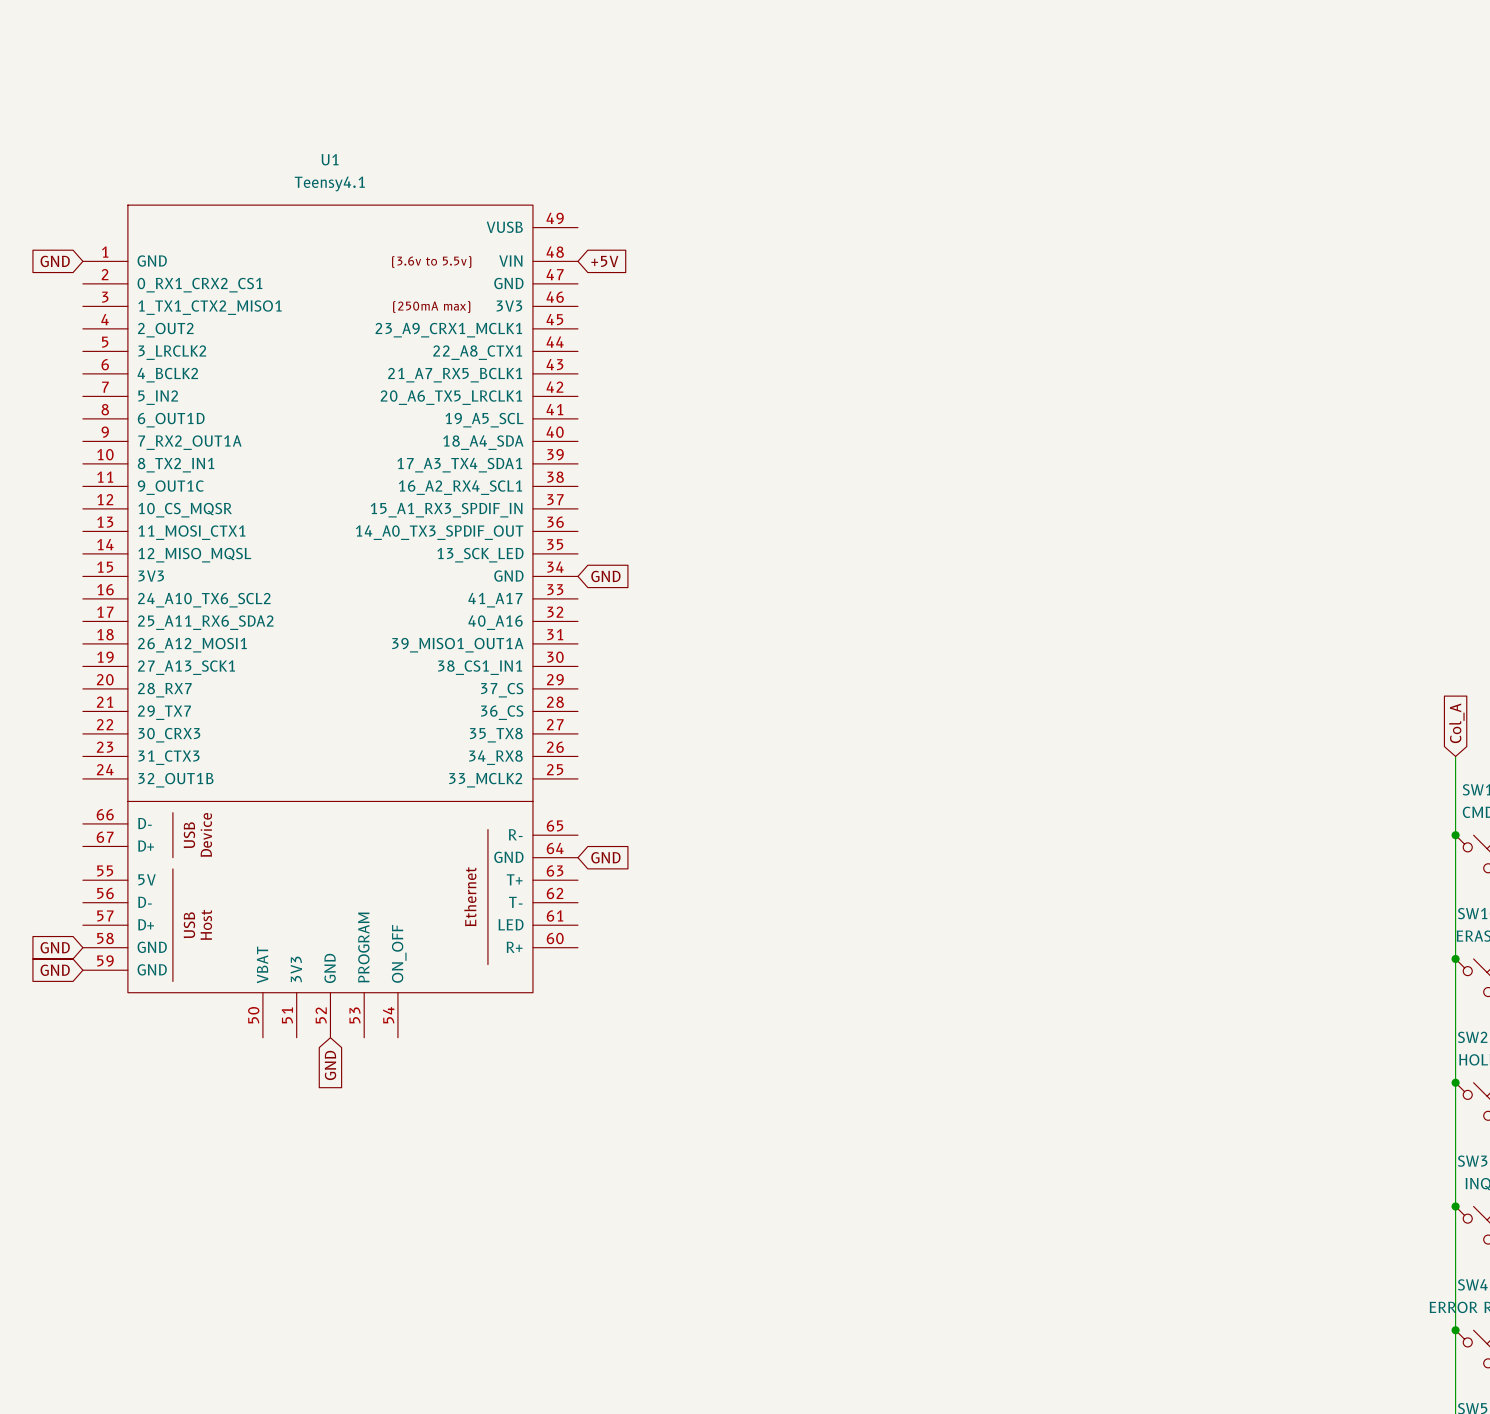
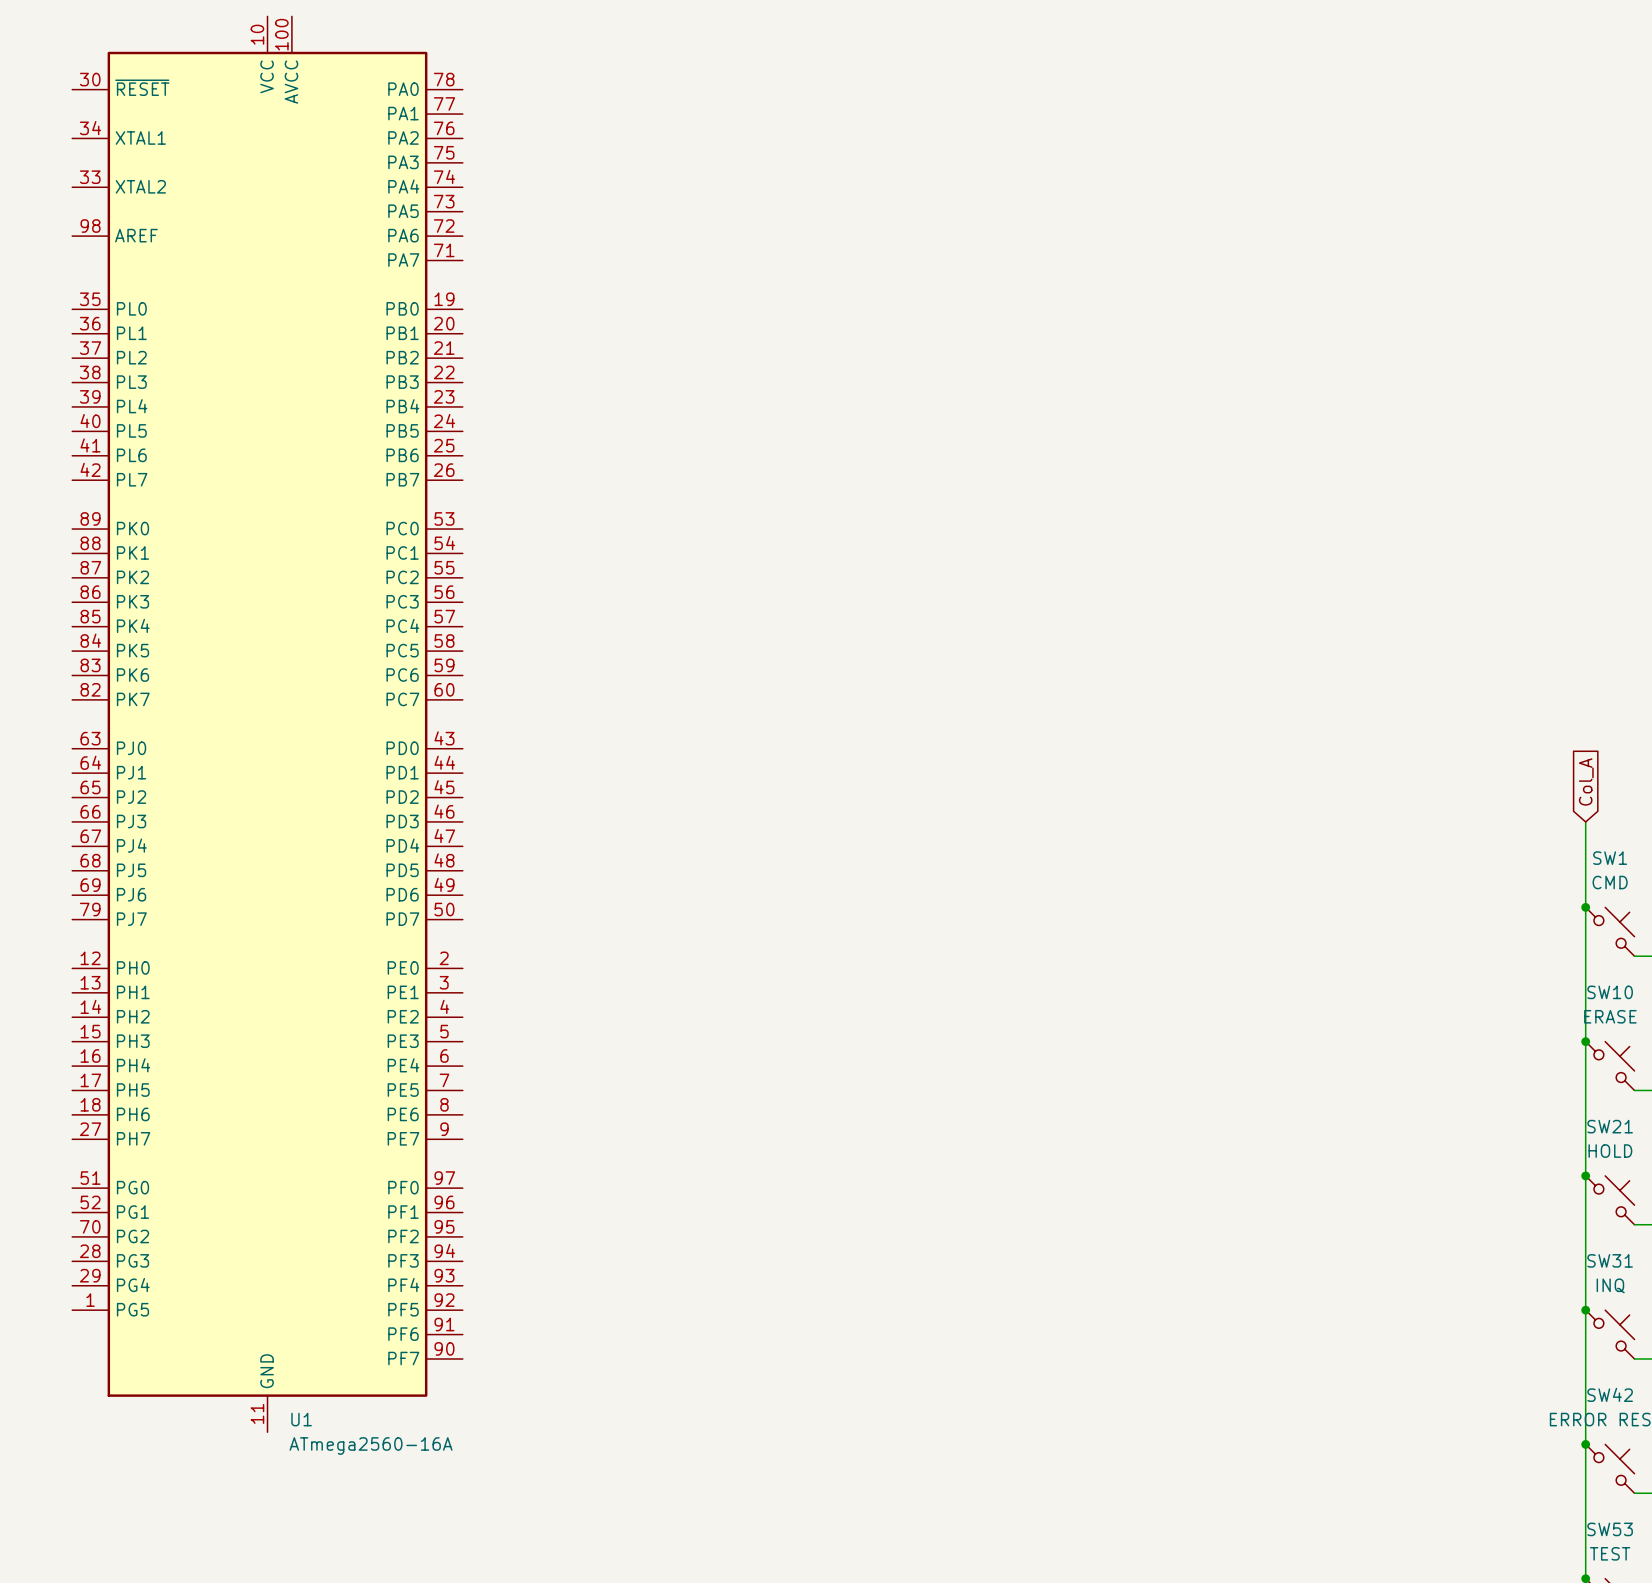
U1 name position: U1 (330, 159) -> U1 (301, 1419)
U1 value: Teensy4.1 (329, 183) -> ATmega2560-16A (371, 1446)
U1 symbol: [82, 205, 578, 1038] -> [72, 16, 463, 1433]
global label: GND (55, 261) -> none
global label: +5V (604, 261) -> none
global label: GND (605, 576) -> none
global label: GND (605, 857) -> none
global label: GND (55, 947) -> none
global label: GND (55, 970) -> none
global label: GND (330, 1065) -> none

